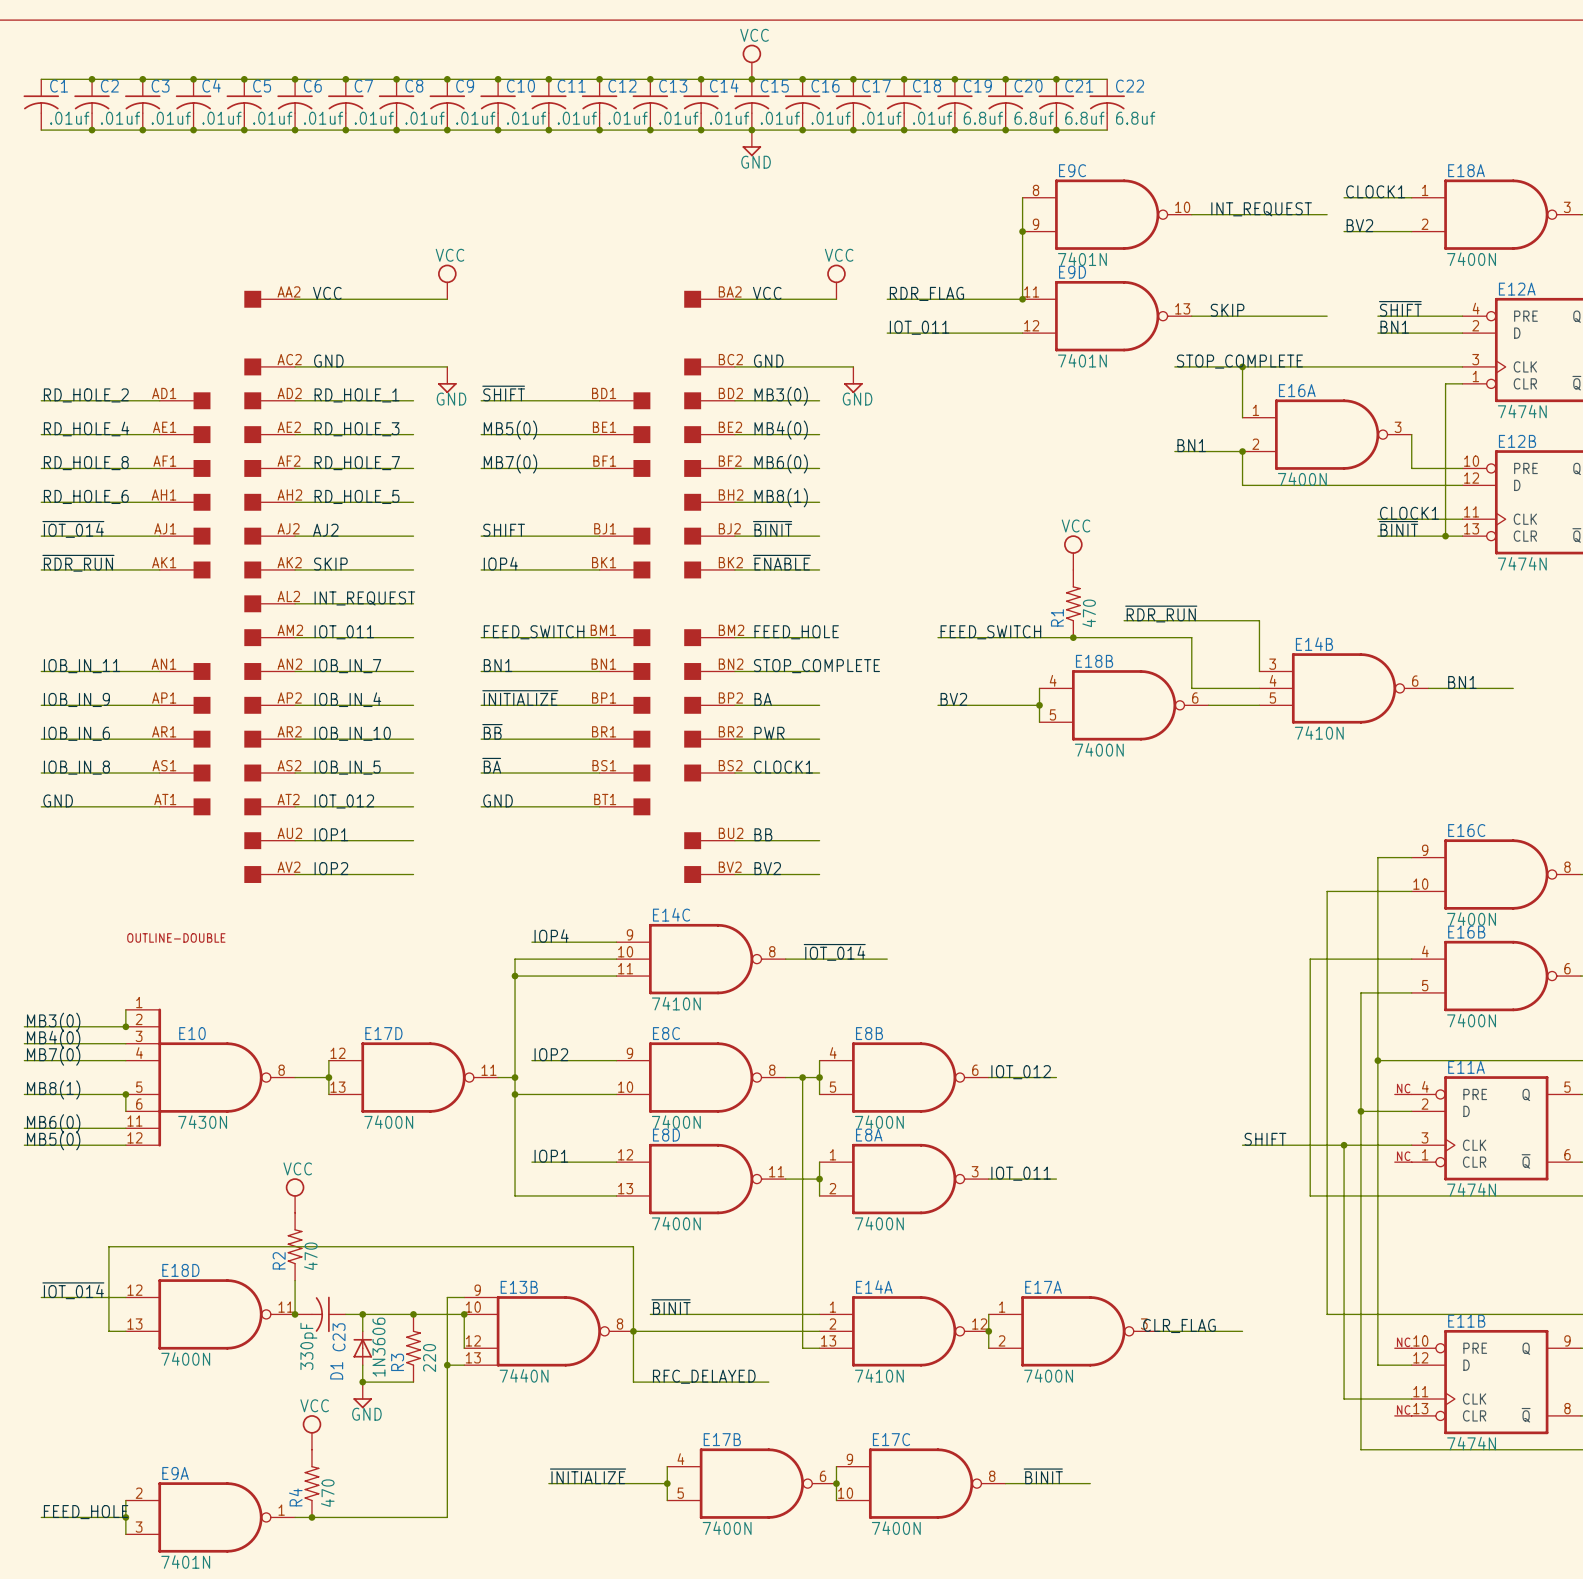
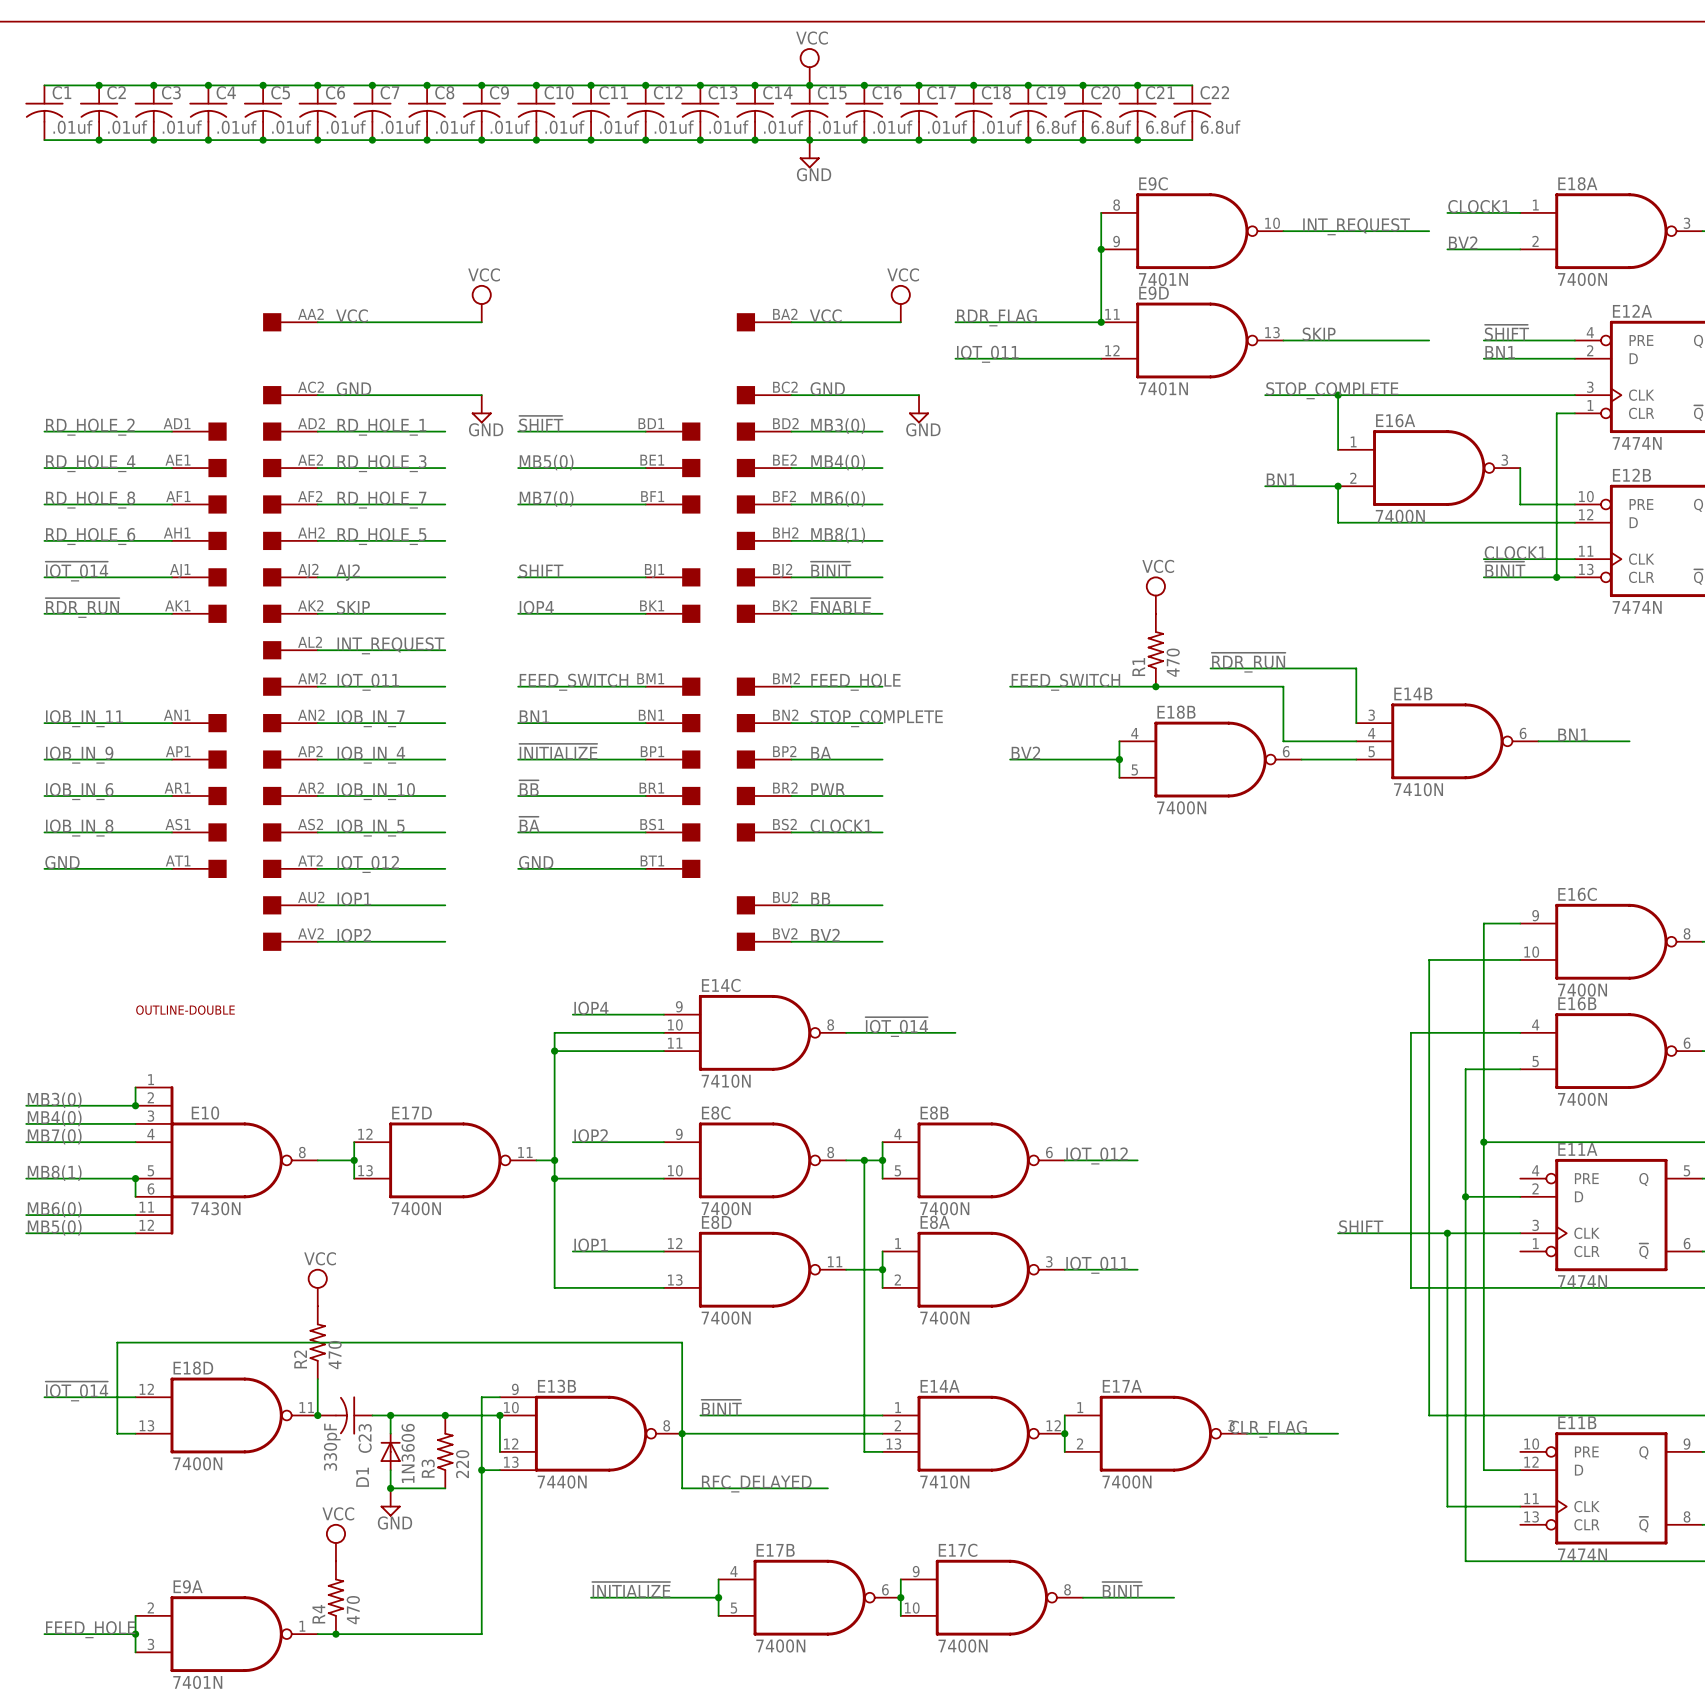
power symbol: (1403, 1094) -> none
power symbol: (1403, 1162) -> none
power symbol: (1403, 1348) -> none
power symbol: (1403, 1415) -> none

